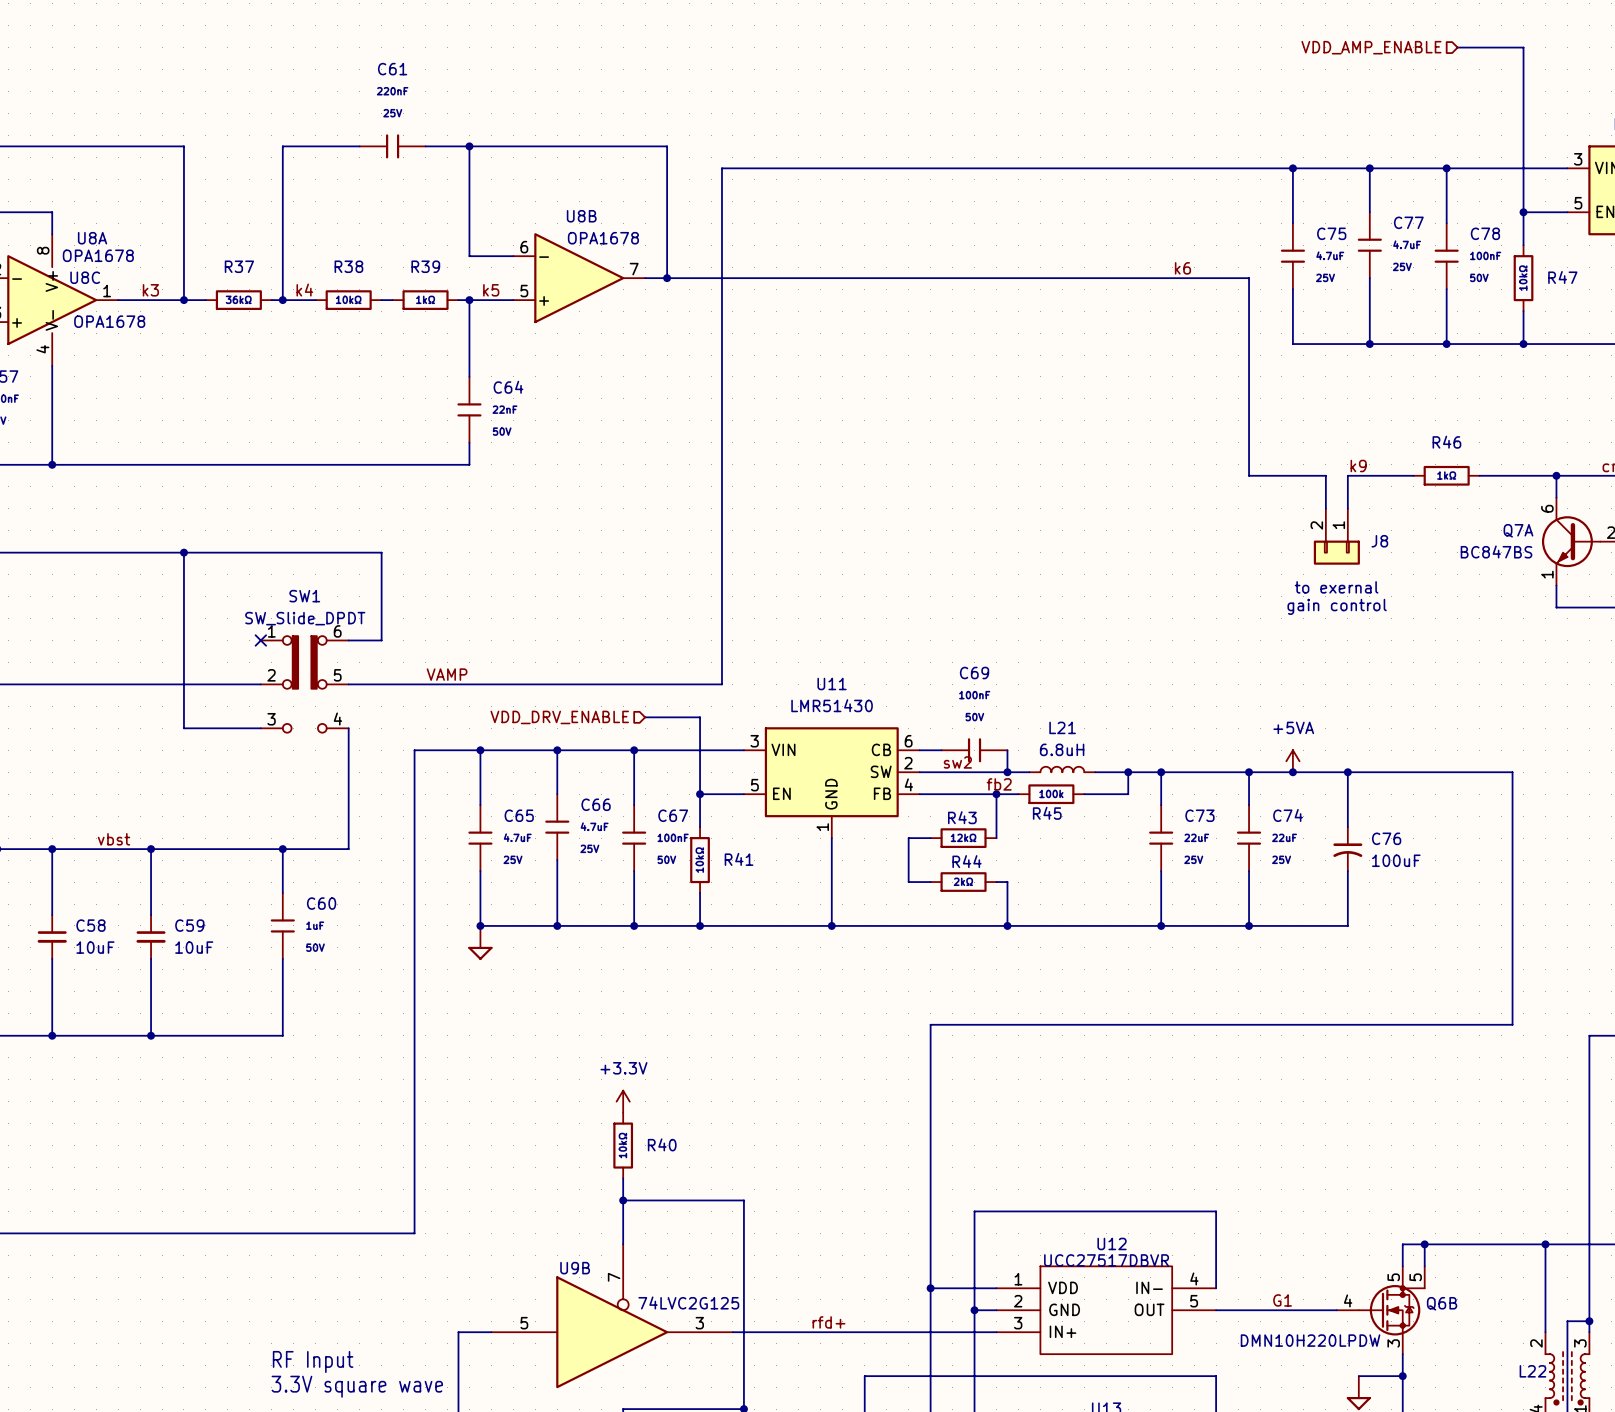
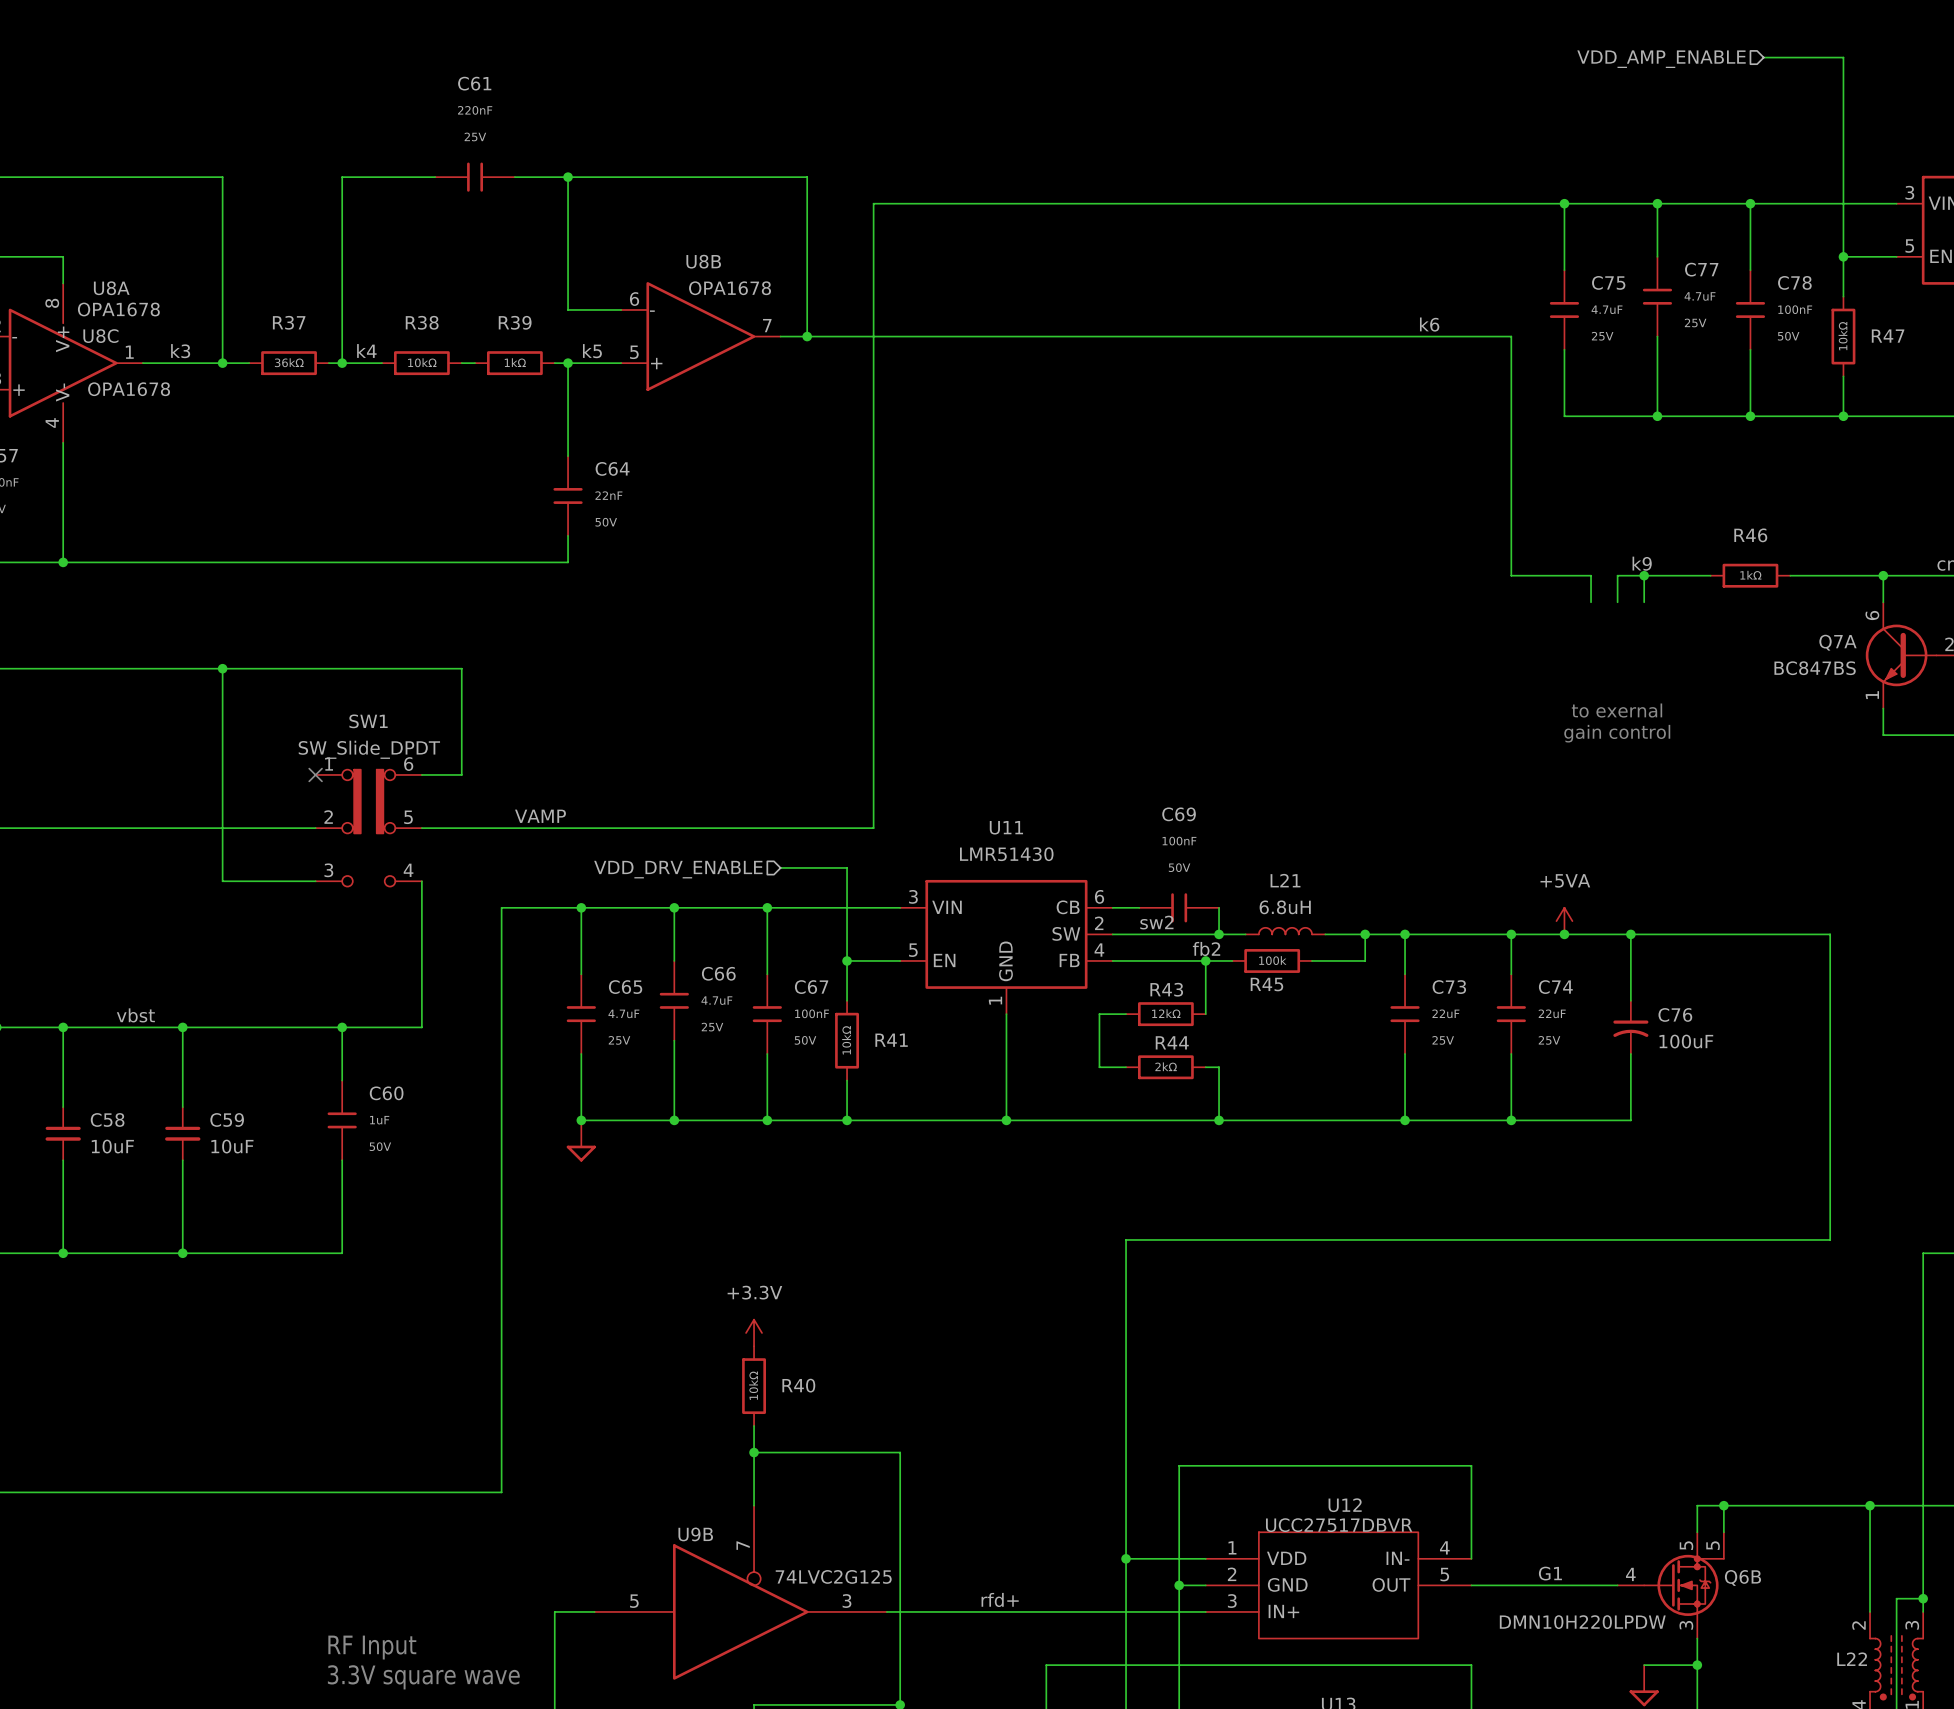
wire: (1314, 475) (1325, 475) (1325, 508) -> (1591, 575) (1591, 602)
wire: (1347, 475) (1347, 508) -> (1630, 575) (1617, 575) (1617, 602)
wire: none -> (1644, 575) (1644, 602)
junction: none -> (1644, 575)
J8: (1336, 536) -> none

